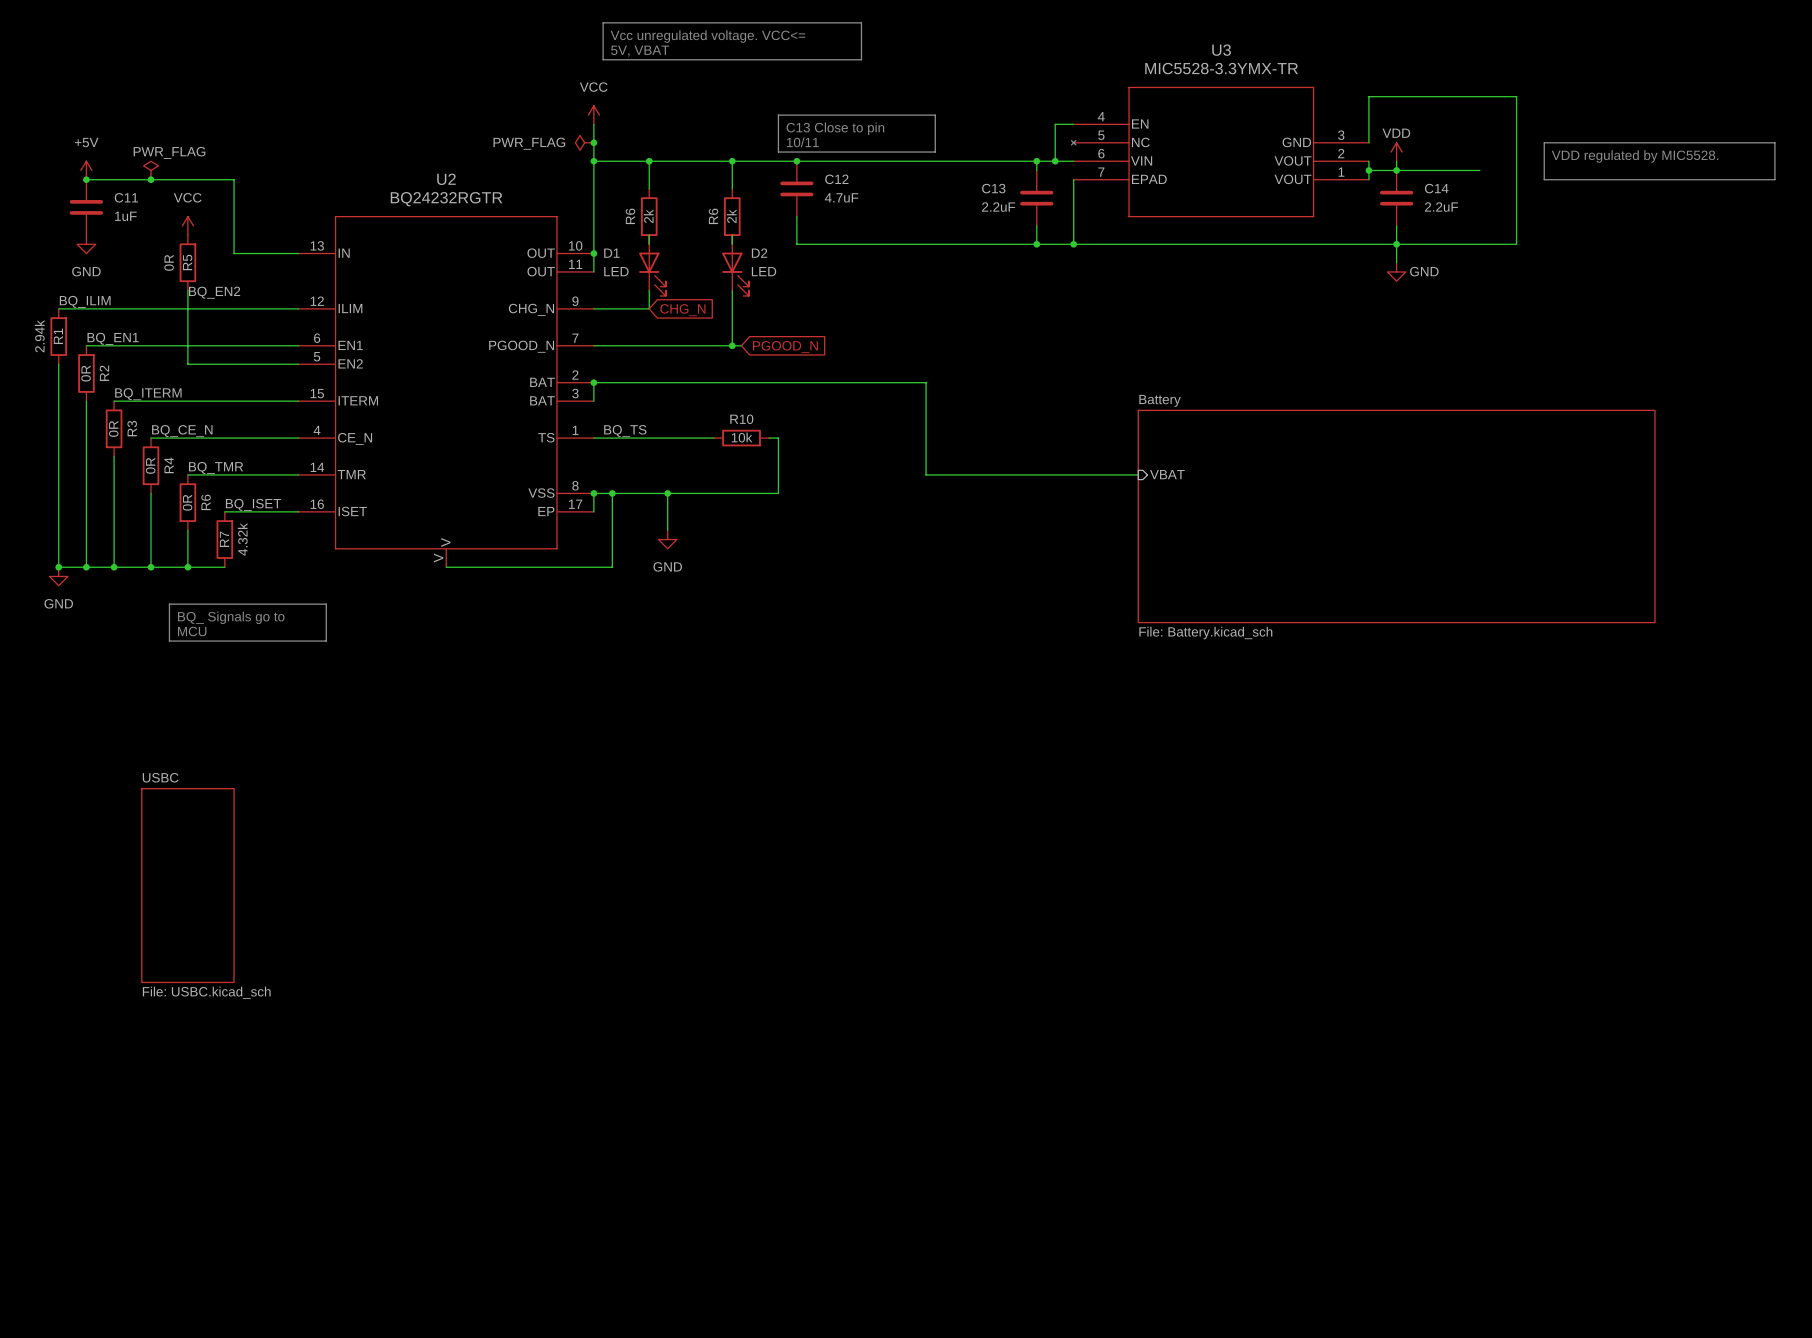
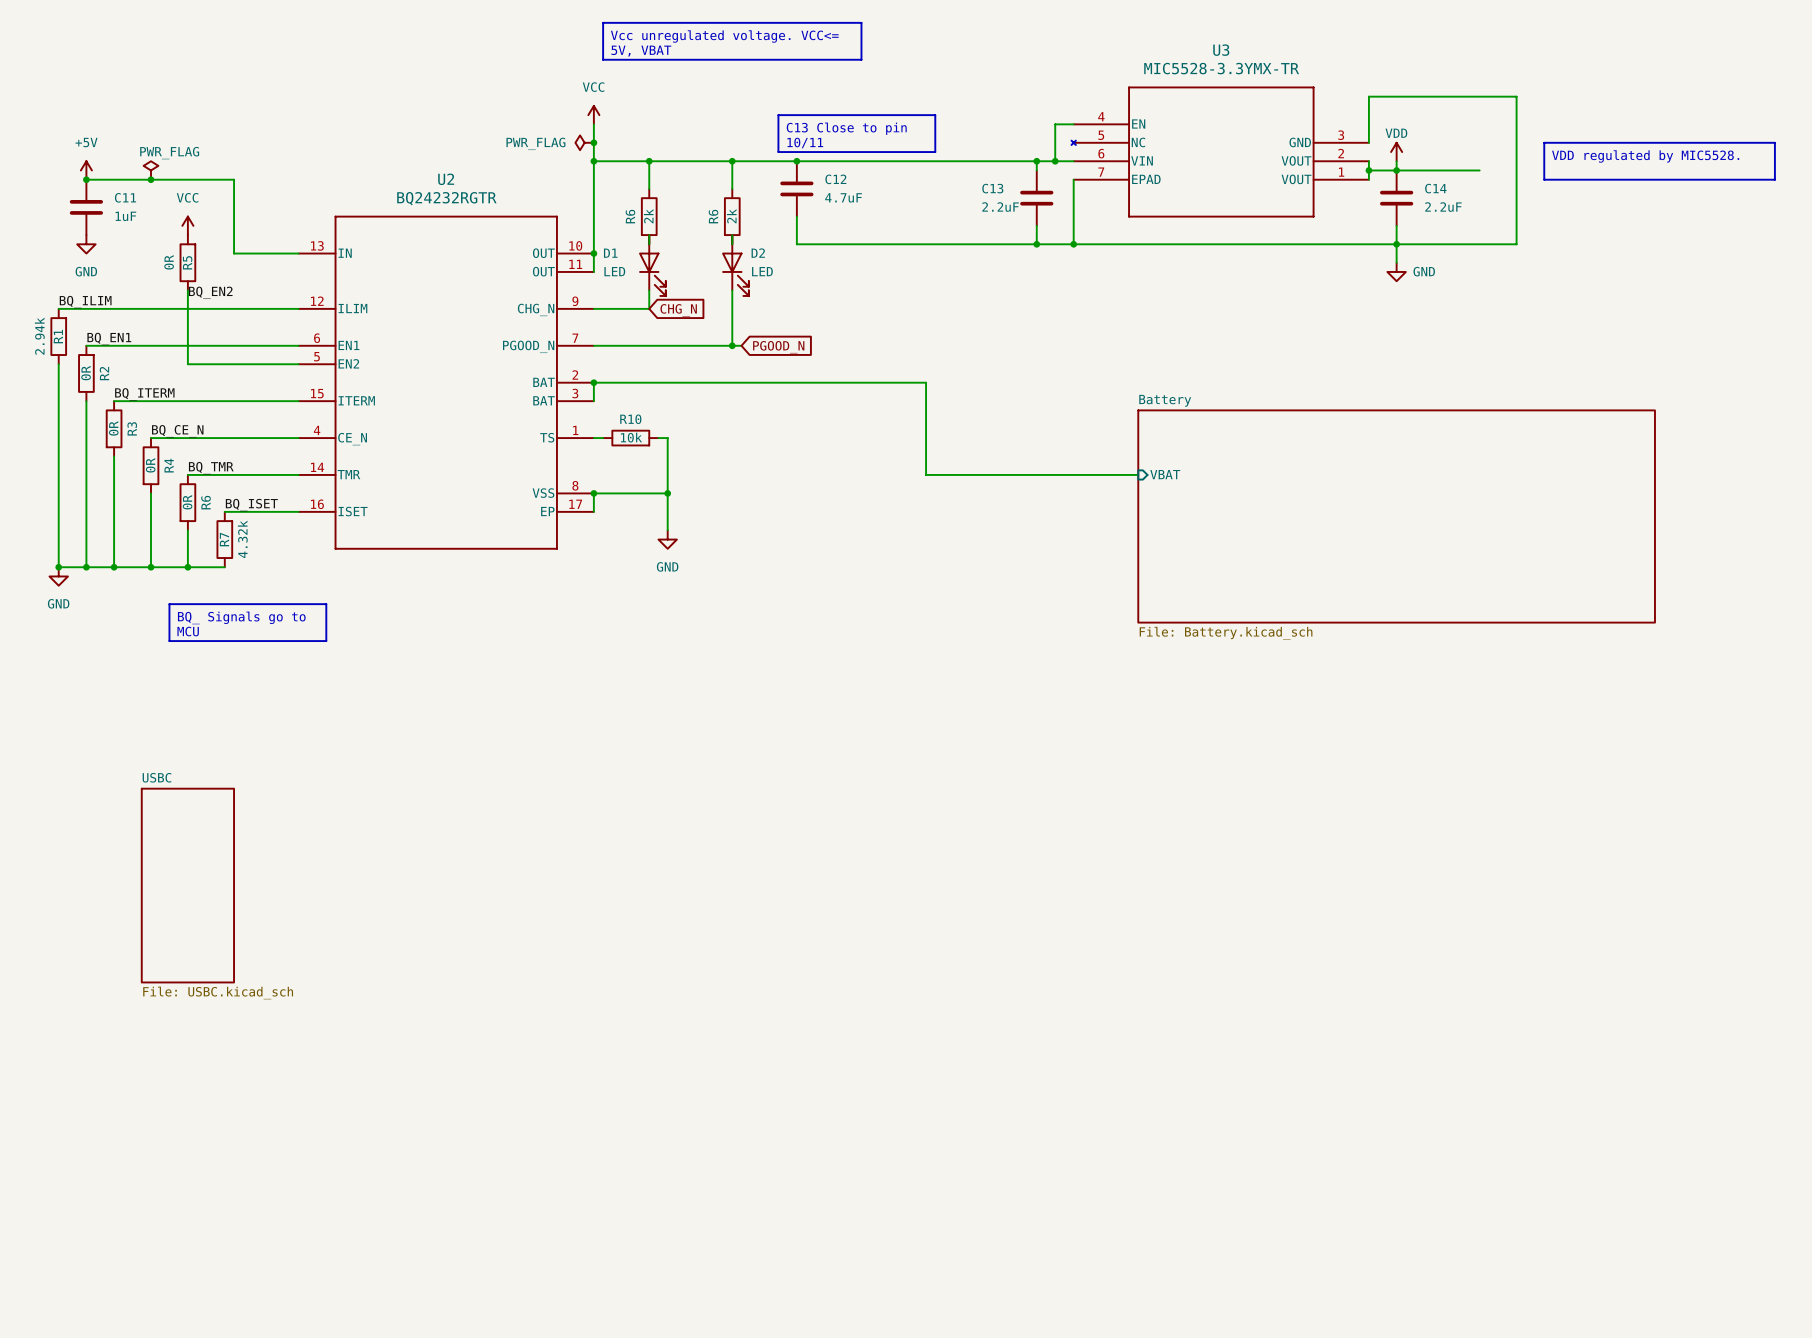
U2 symbol: [298, 216, 594, 568] -> [298, 216, 594, 550]
label: BQ_TS (625, 431) -> none
wire: (603, 438) (658, 438) -> none
wire: (667, 438) (713, 438) -> (667, 438) (667, 493)
R10 position: (741, 438) -> (630, 438)
wire: (769, 438) (778, 438) (778, 493) (667, 493) -> none
wire: (612, 493) (612, 567) (446, 567) -> none
junction: (612, 493) -> none

